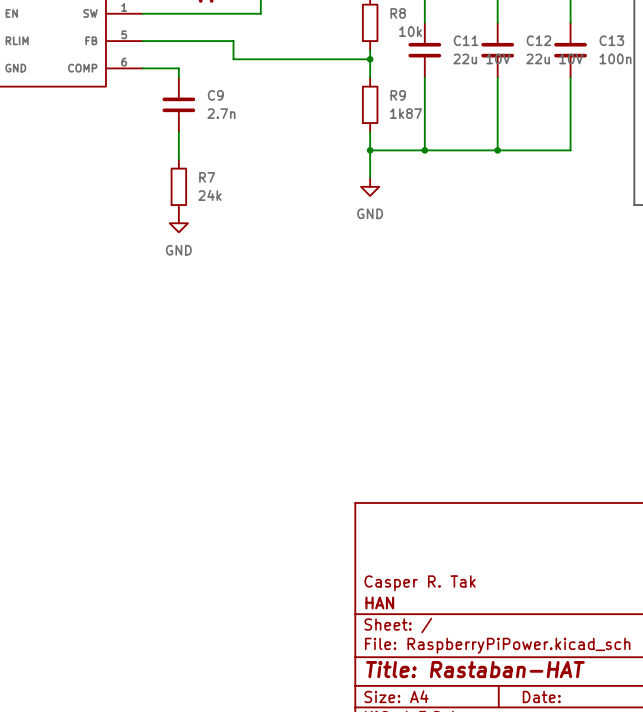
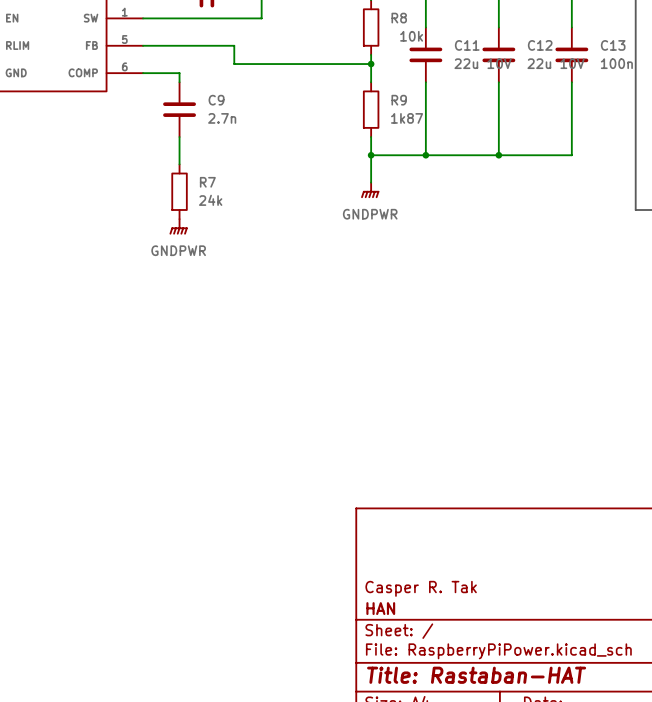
power symbol: GND (370, 186) -> GNDPWR (370, 190)
power symbol: GND (178, 223) -> GNDPWR (178, 226)

